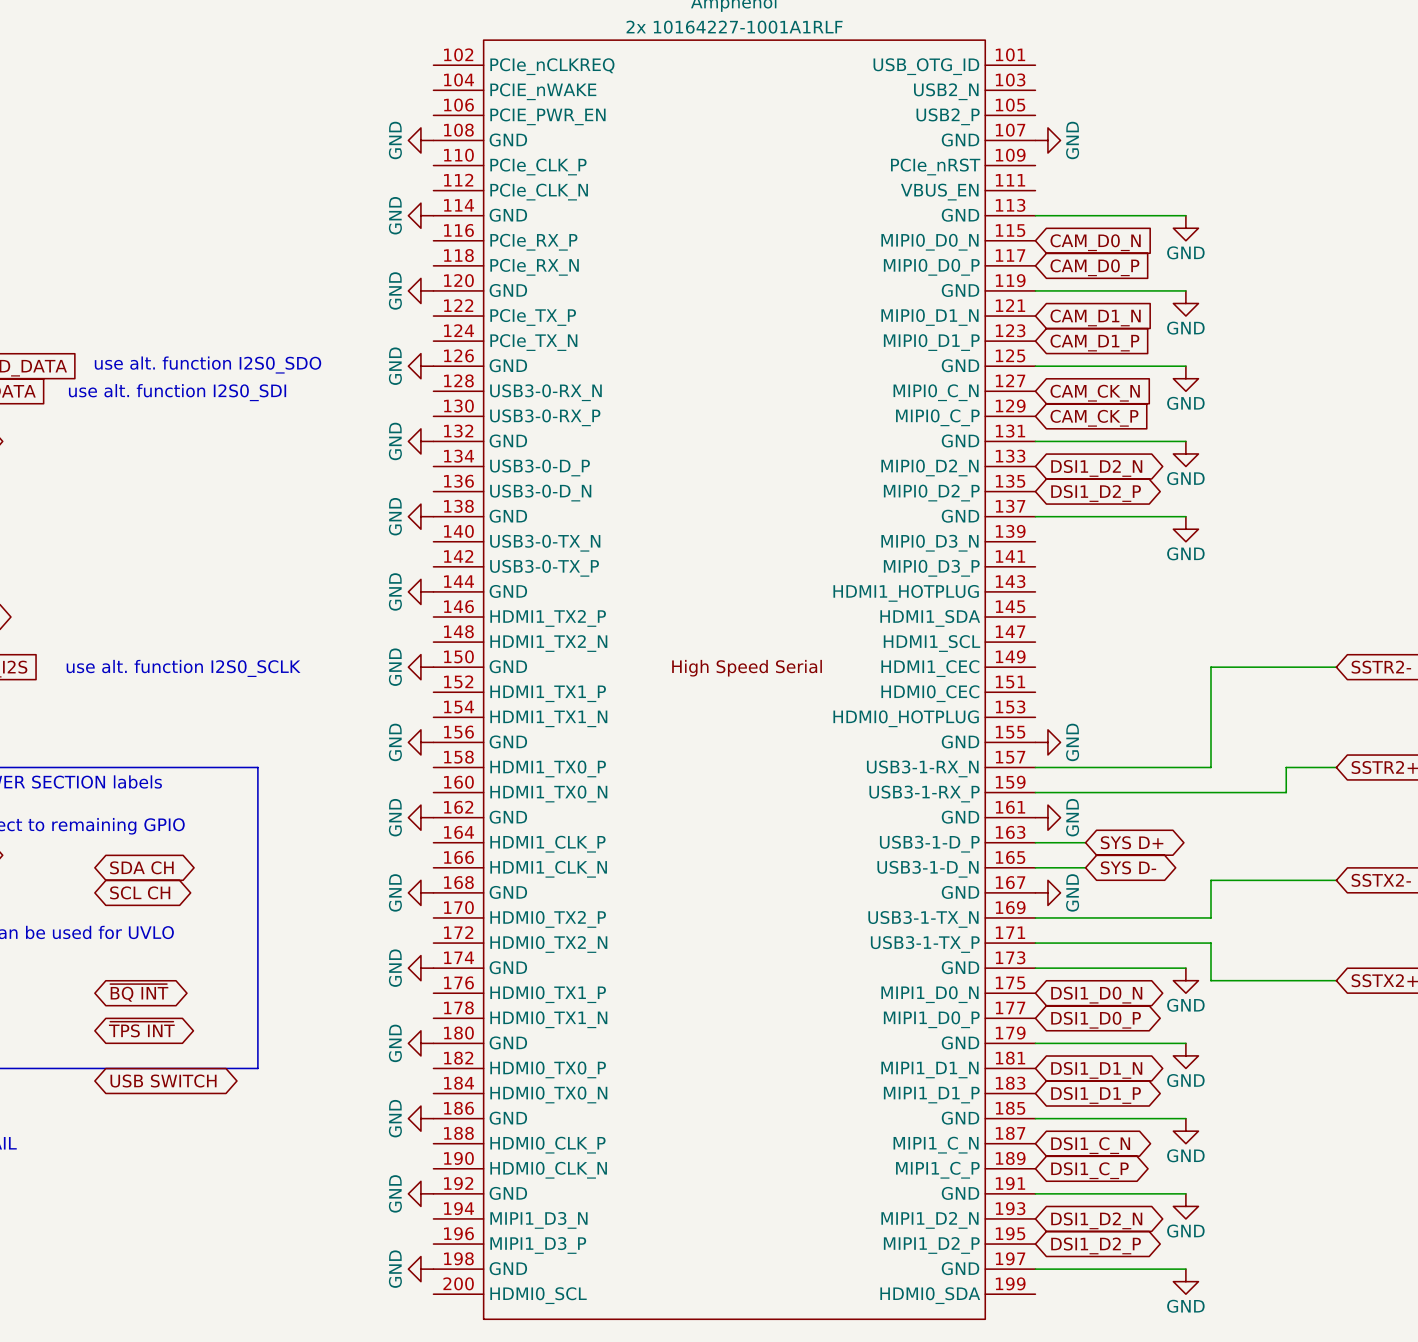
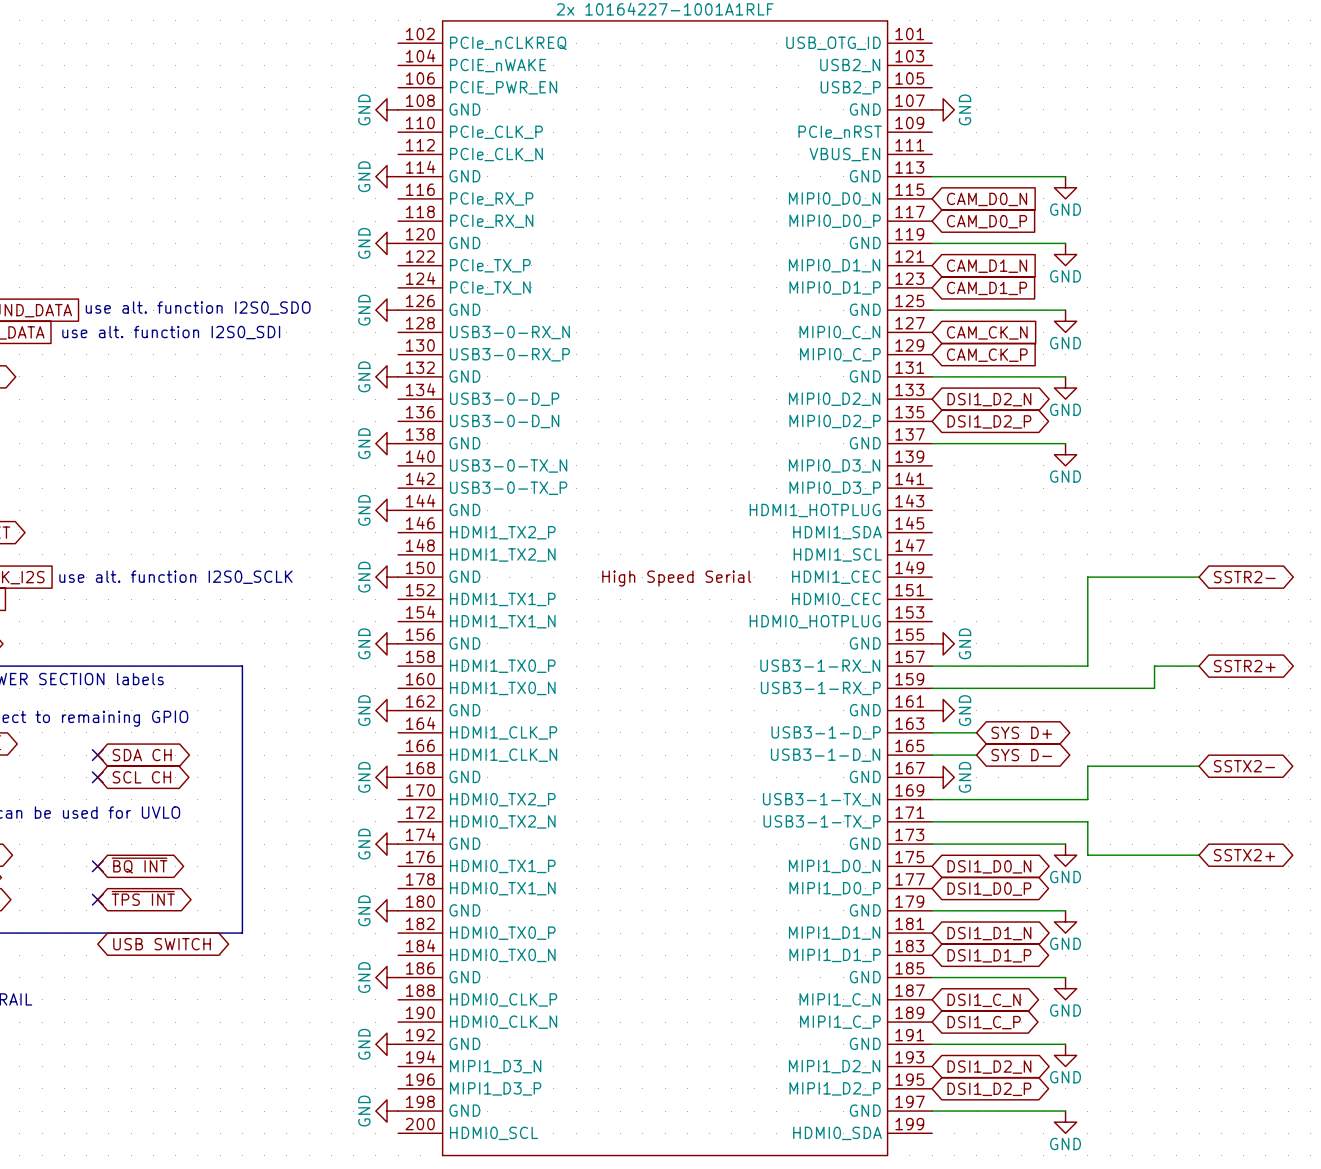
no-connect mark: none -> (97, 755)
no-connect mark: none -> (97, 777)
no-connect mark: none -> (97, 866)
no-connect mark: none -> (97, 899)

